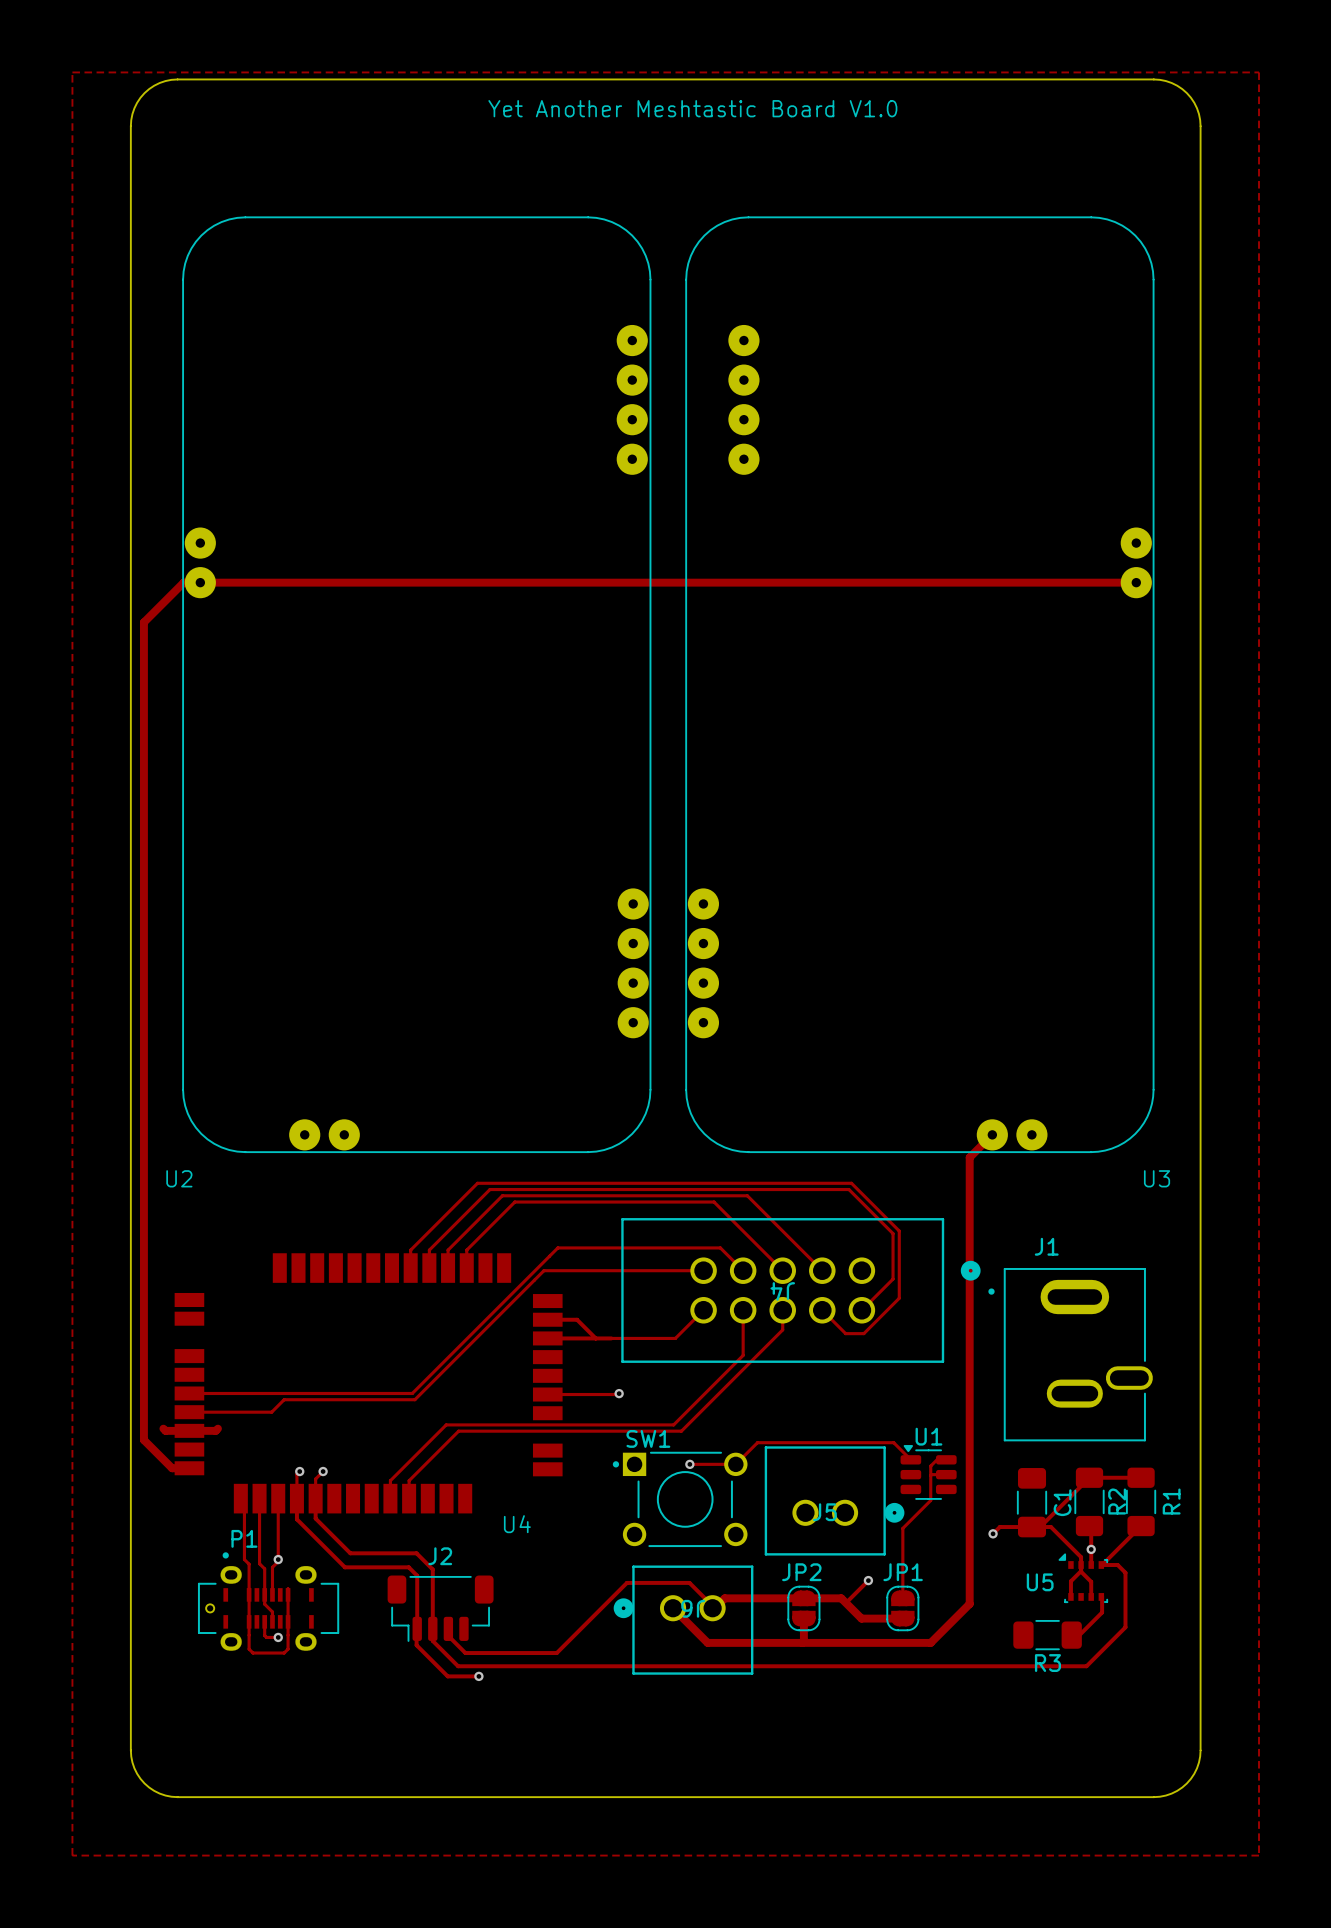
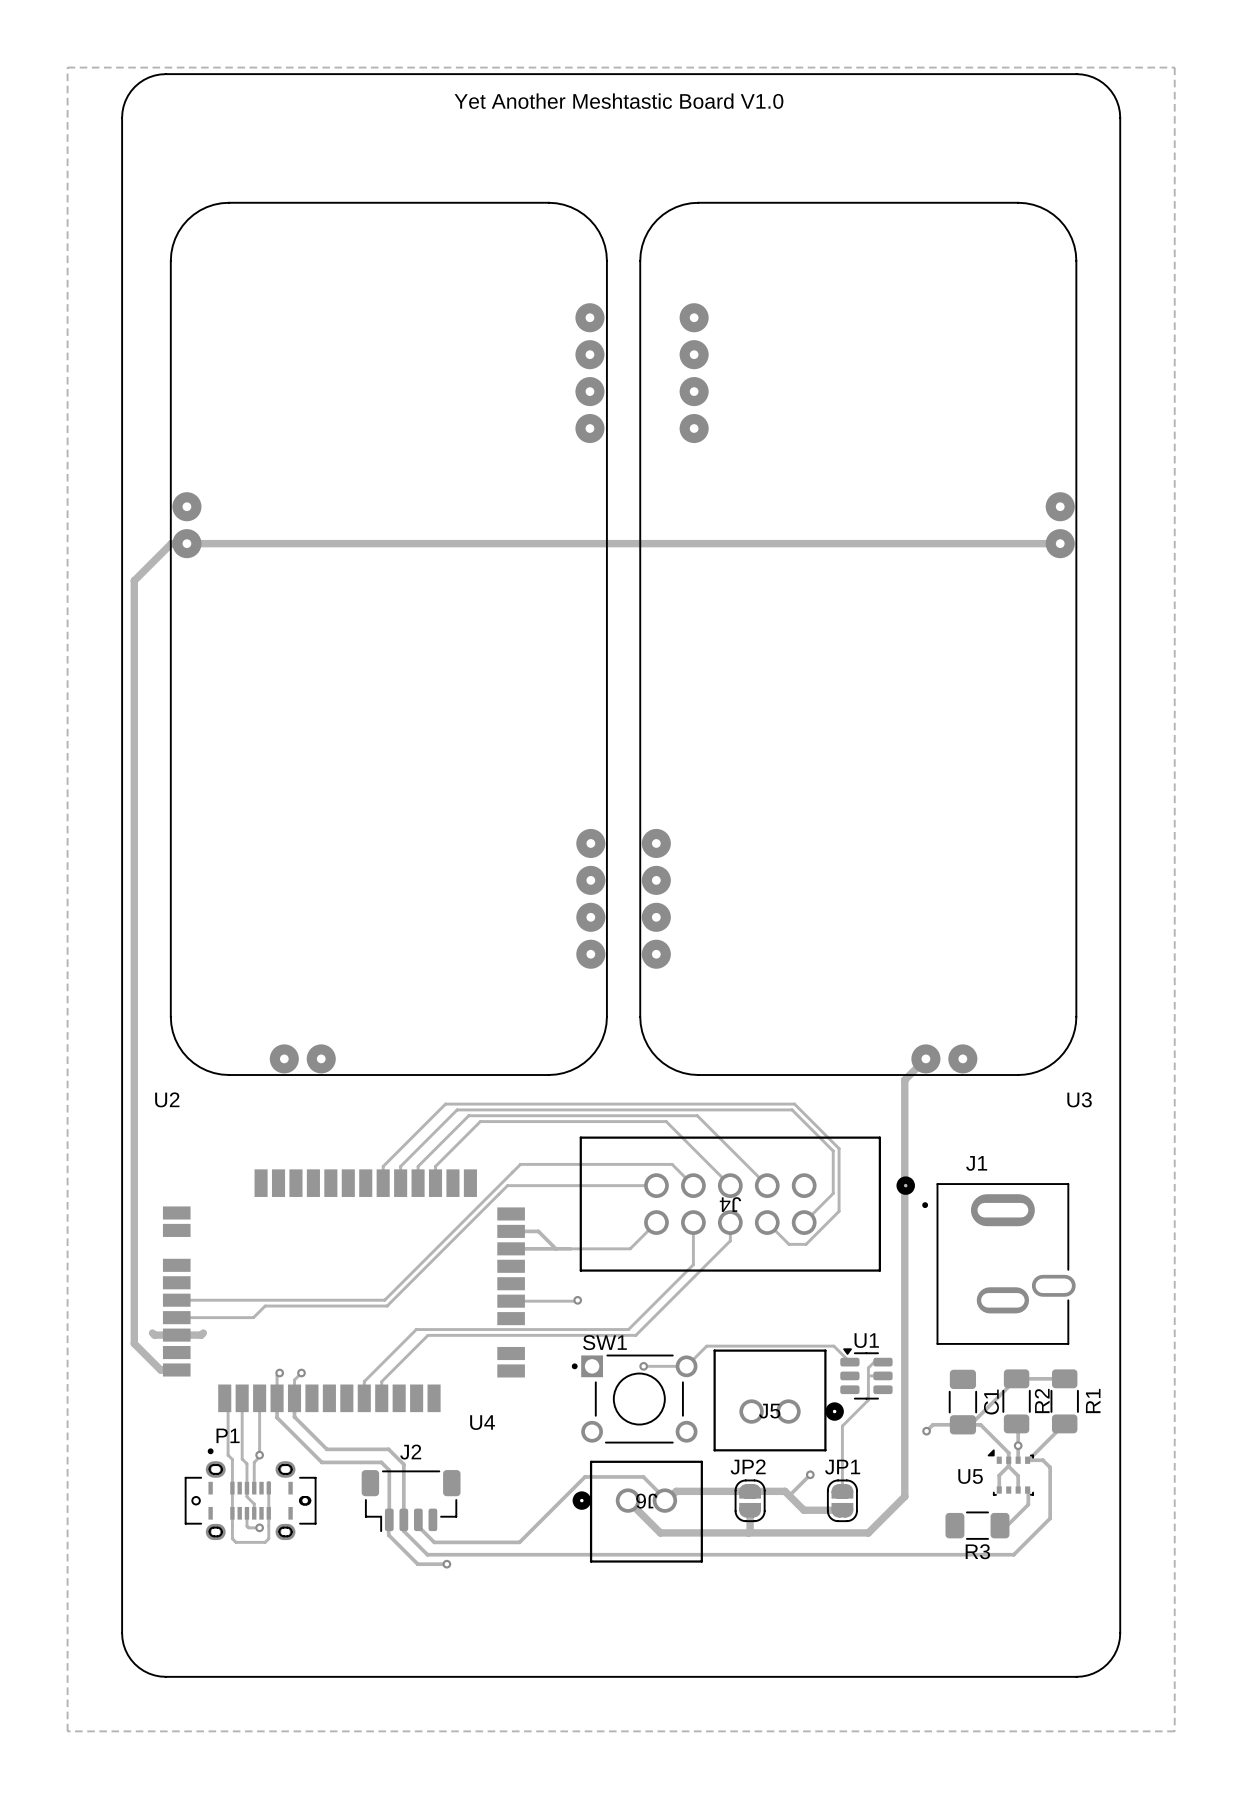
P1 footprint: [197, 1552, 340, 1651] -> [184, 1448, 317, 1541]

